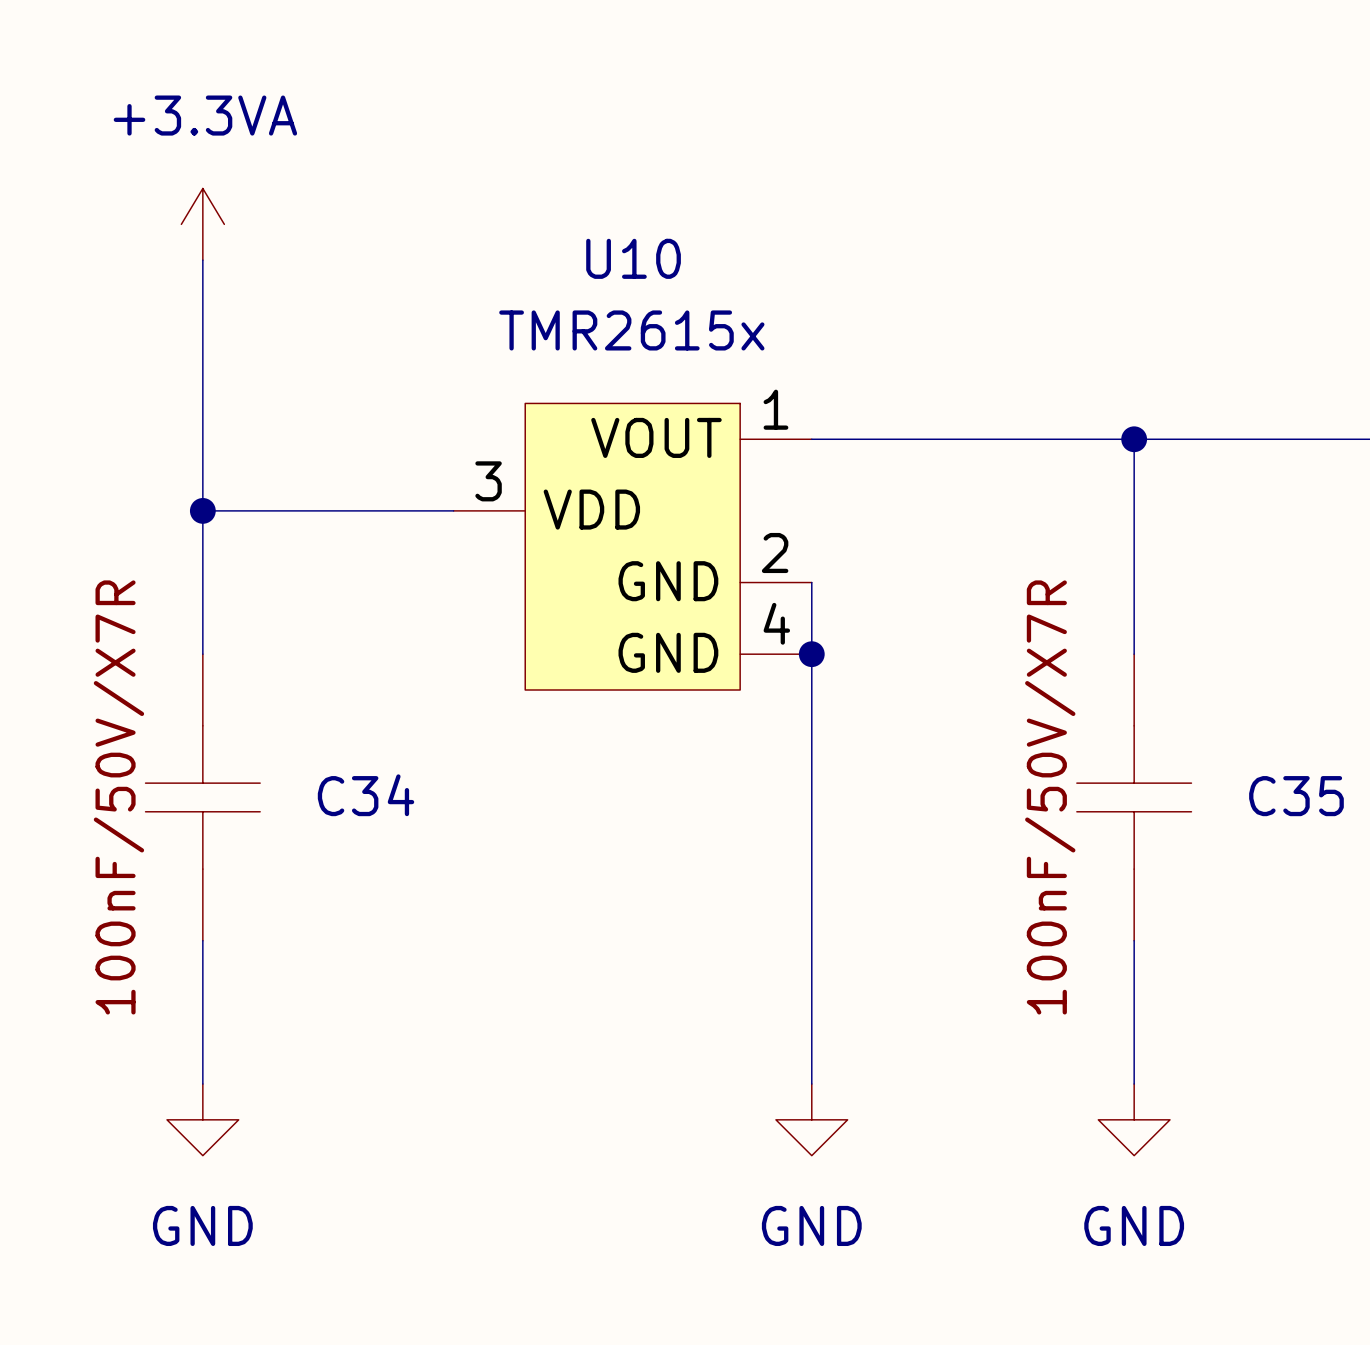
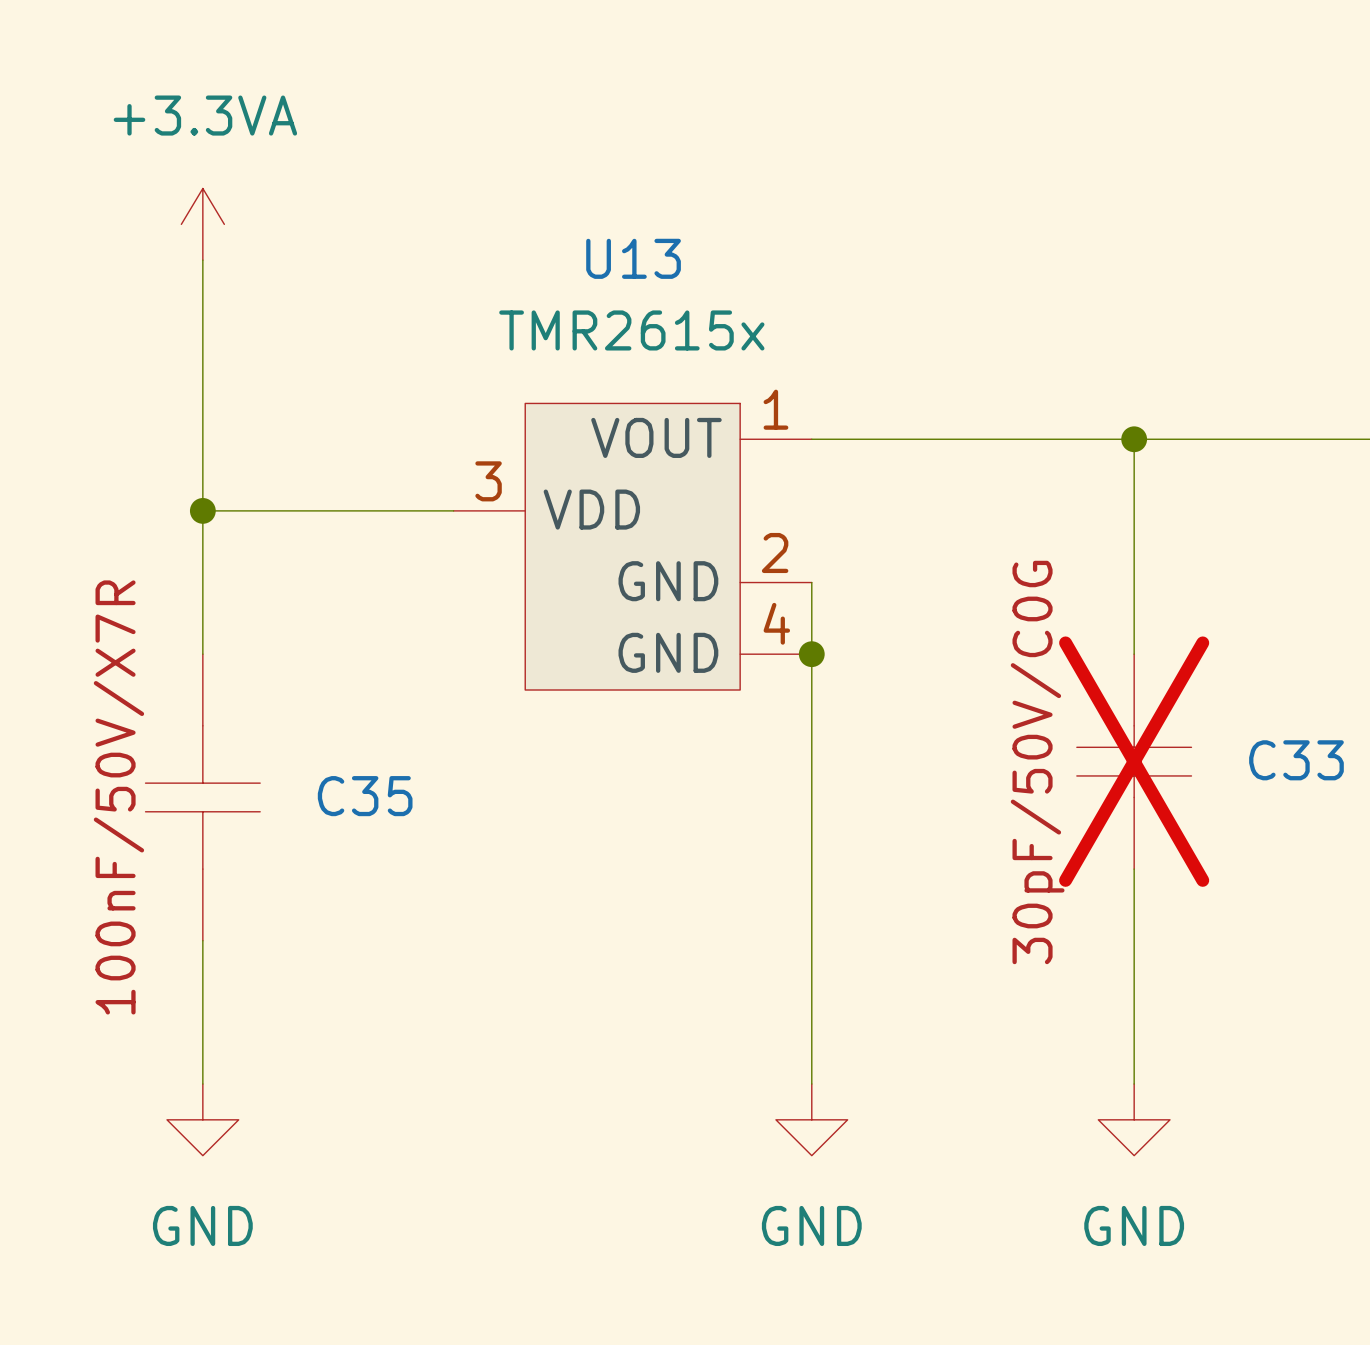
U10 name: U10 (633, 258) -> U13 (633, 258)
C33: none -> (1134, 761)
C34 name: C34 (366, 795) -> C35 (365, 796)
C35: (1134, 797) -> none

